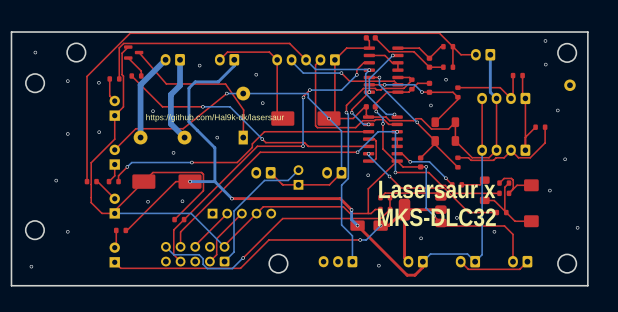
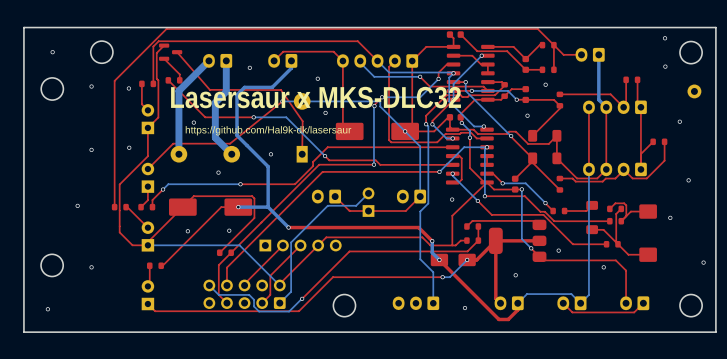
text: none -> Lasersaur x MKS-DLC32 (316, 97)
text: Lasersaur x (437, 189) -> none
text: MKS-DLC32 (436, 217) -> none

